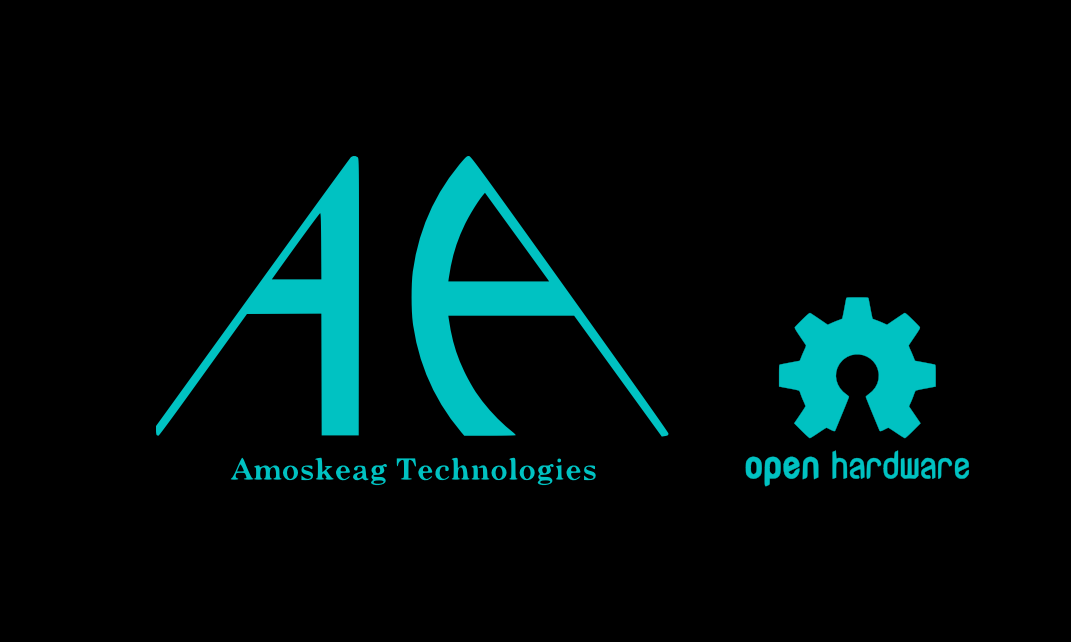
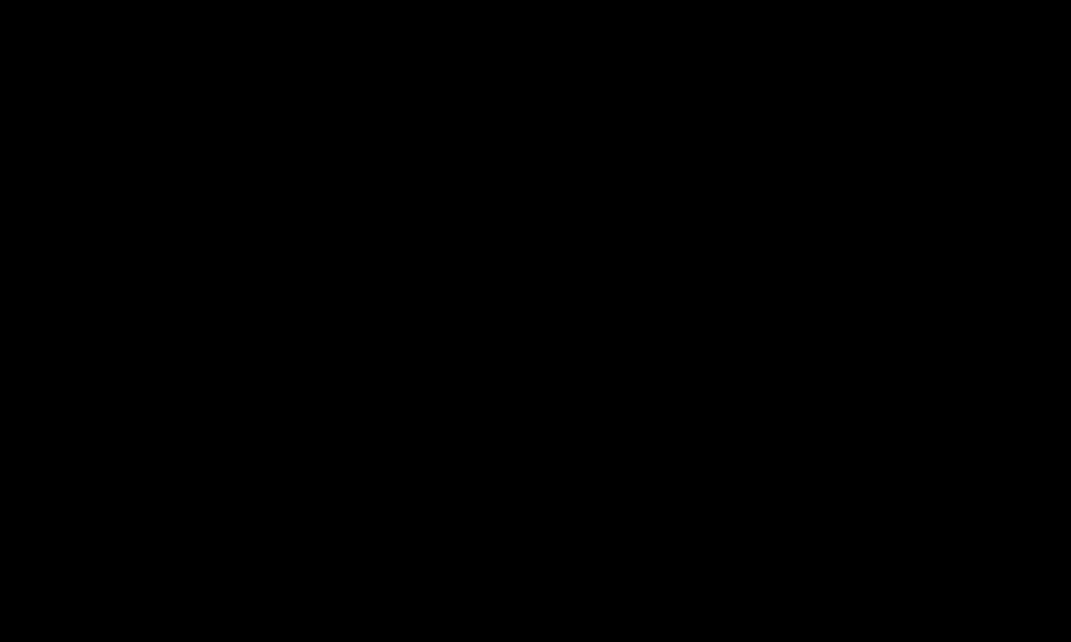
drawing: [156, 156, 669, 486] -> none
drawing: [745, 297, 970, 487] -> none

